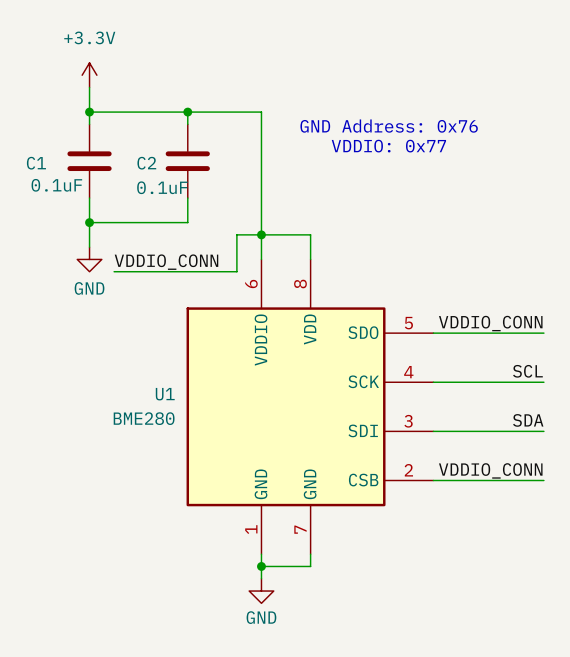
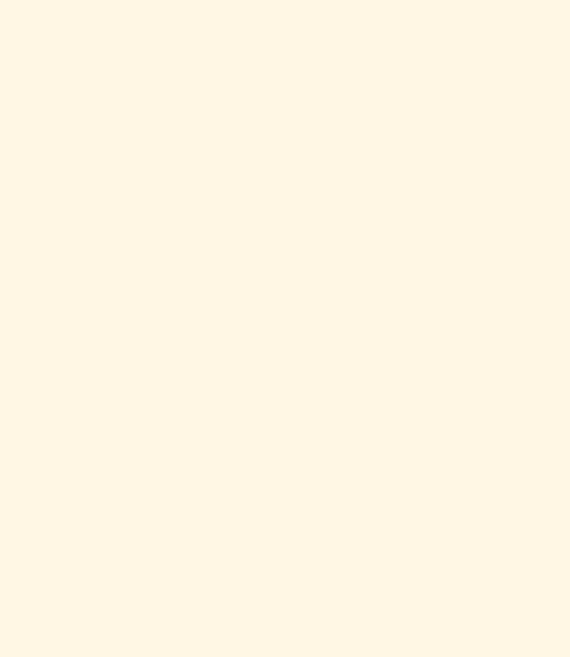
power symbol: +3.3V (89, 75) -> none
wire: (89, 87) (89, 124) -> none
wire: (89, 112) (261, 112) (261, 259) -> none
junction: (89, 112) -> none
wire: (187, 112) (187, 124) -> none
junction: (187, 112) -> none
text: GND Address: 0x76 (389, 126) -> none
text: VDDIO: 0x77 (388, 146) -> none
C1: 0.1uF (89, 161) -> none
C2: 0.1uF (187, 161) -> none
wire: (89, 198) (89, 247) -> none
wire: (187, 198) (187, 222) (89, 222) -> none
junction: (89, 222) -> none
junction: (261, 234) -> none
power symbol: GND (89, 259) -> none
wire: (310, 259) (310, 234) (236, 234) (236, 271) (114, 271) -> none
label: VDDIO_CONN (166, 262) -> none
label: VDDIO_CONN (490, 323) -> none
wire: (433, 333) (543, 333) -> none
label: SCL (527, 371) -> none
wire: (433, 382) (543, 382) -> none
U1: BME280 (309, 406) -> none
label: SDA (528, 420) -> none
wire: (433, 431) (543, 431) -> none
label: VDDIO_CONN (490, 470) -> none
wire: (433, 480) (543, 480) -> none
wire: (261, 554) (261, 578) -> none
wire: (310, 554) (310, 566) (261, 566) -> none
junction: (261, 566) -> none
power symbol: GND (261, 591) -> none

